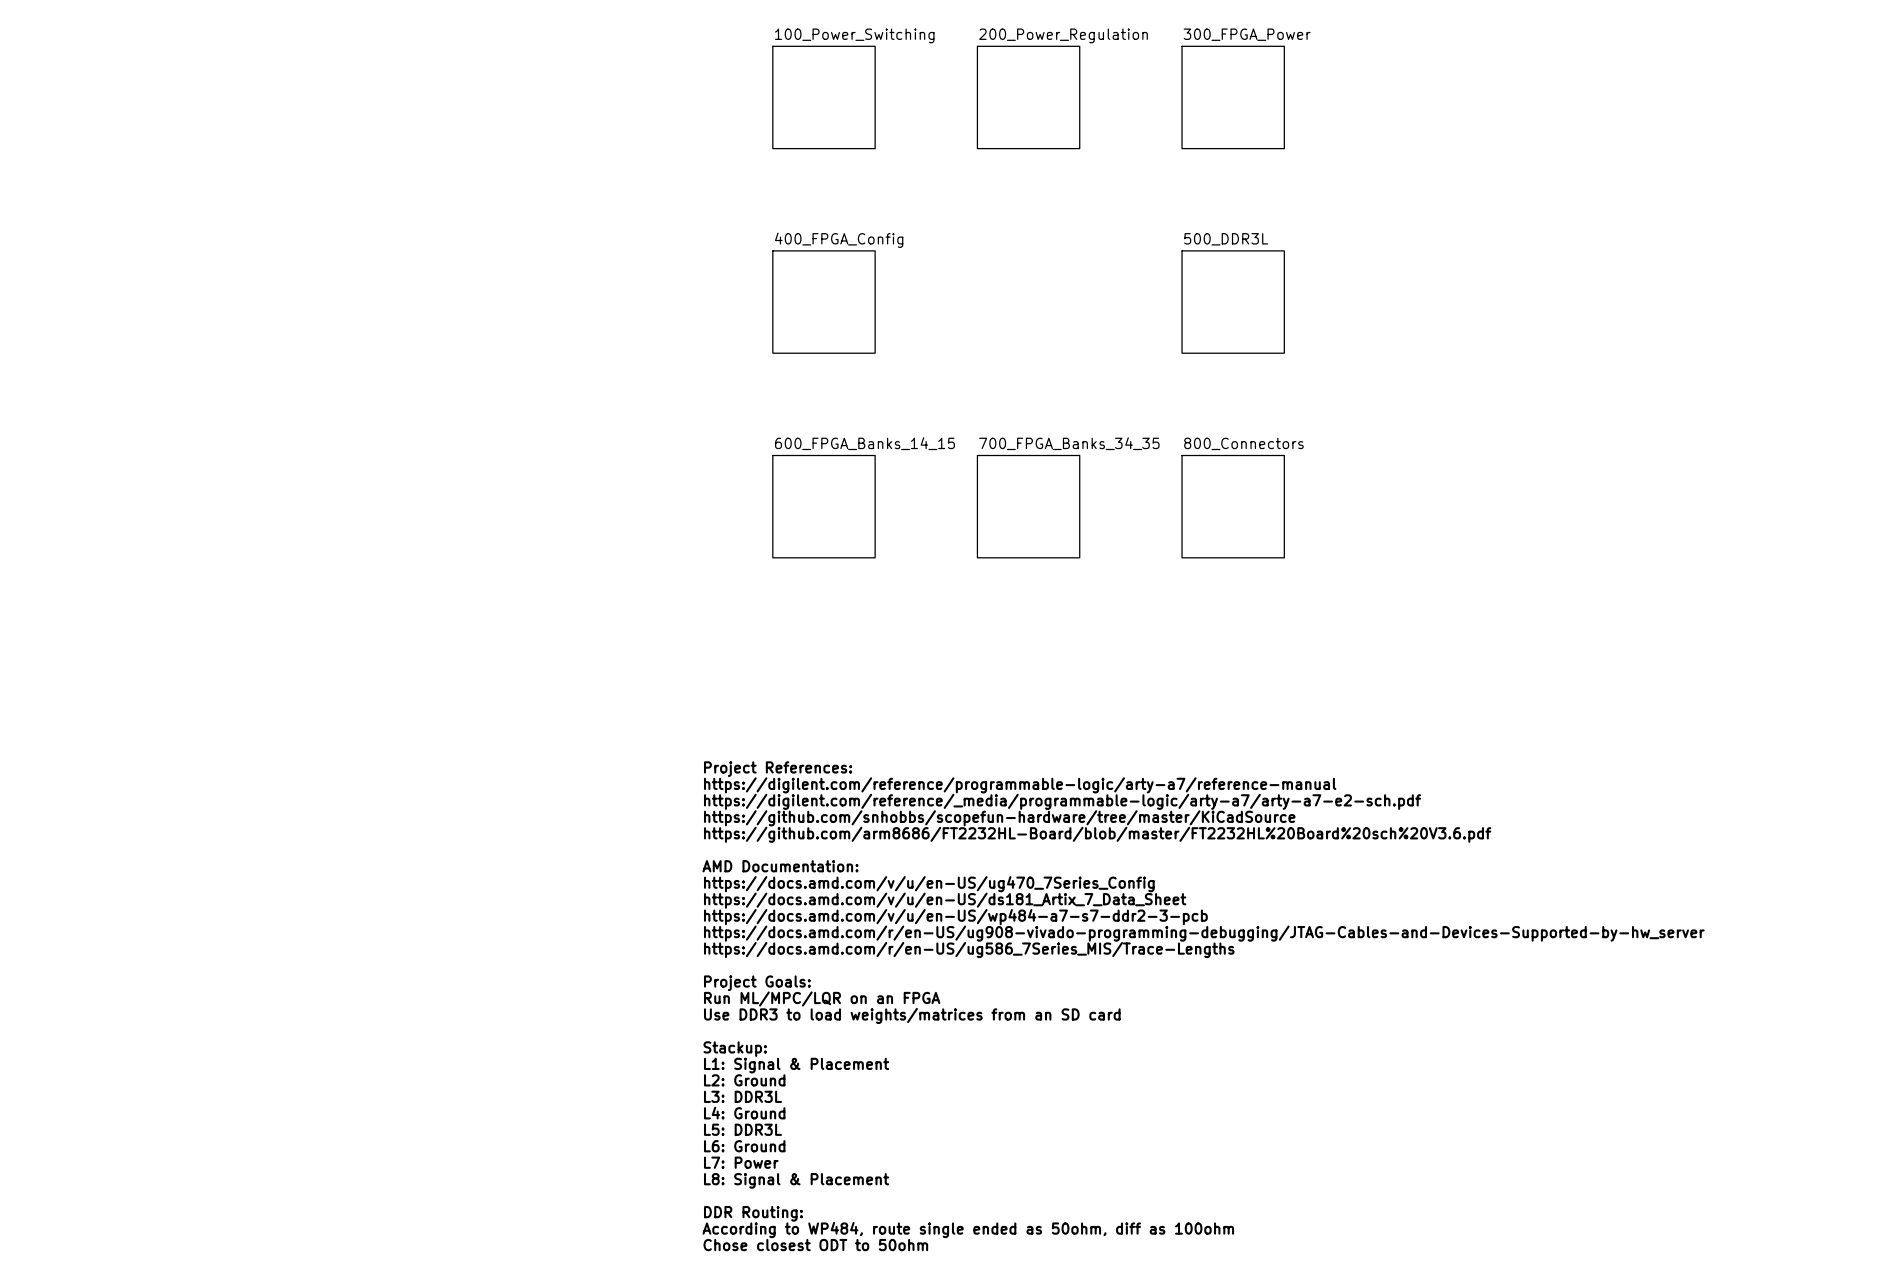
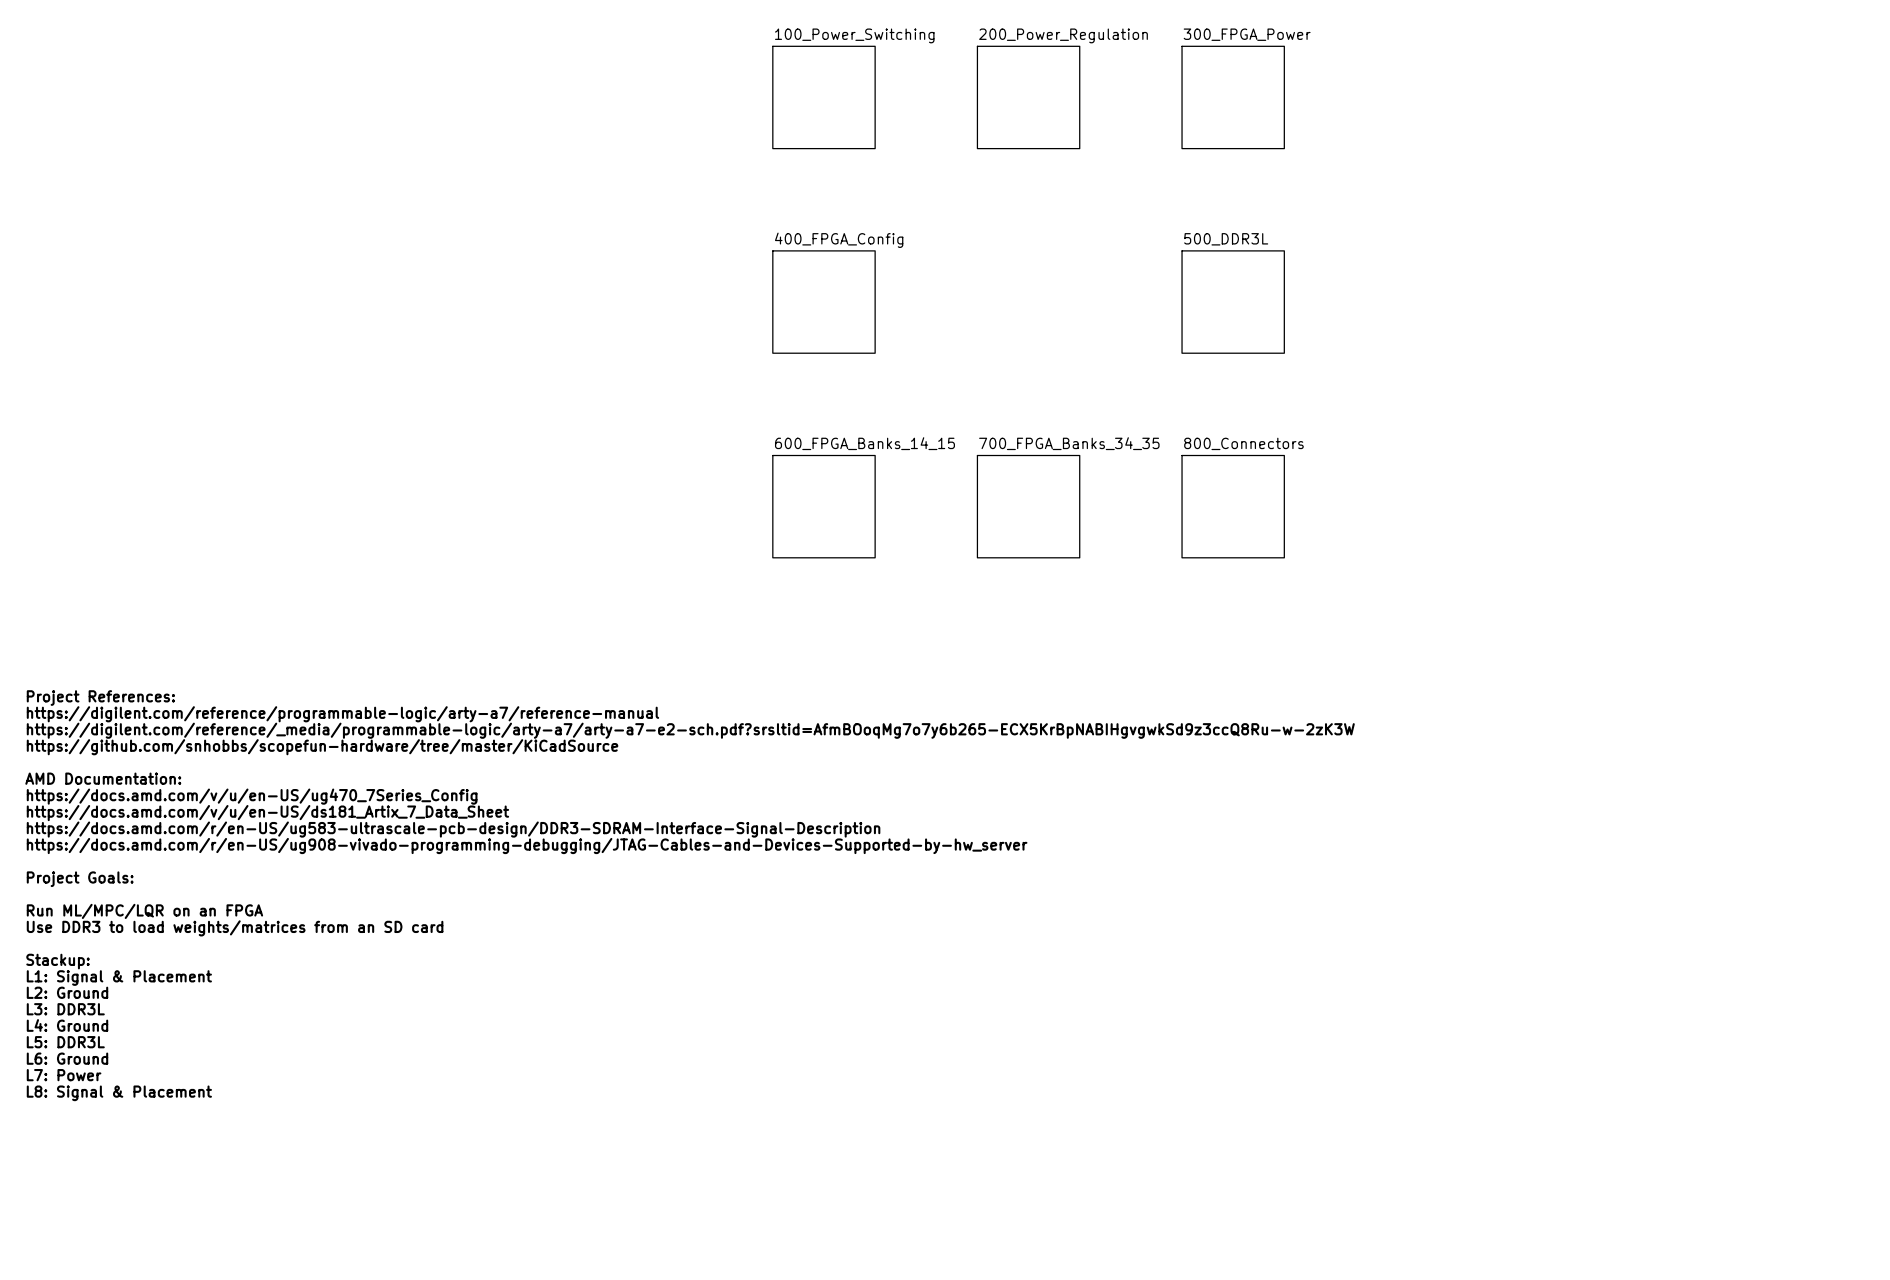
text: none -> Project References: (100, 698)
text: none -> https://digilent.com/reference/programmable-logic/arty-a7/reference-manual (342, 714)
text: none -> https://digilent.com/reference/_media/programmable-logic/arty-a7/arty-a7-e2-sch.pdf?srsltid=AfmBOoqMg7o7y6b265-ECX5KrBpNABIHgvgwkSd9z3ccQ8Ru-w-2zK3W (690, 730)
text: none -> https://github.com/snhobbs/scopefun-hardware/tree/master/KiCadSource (322, 747)
text: Project References: (778, 769) -> none
text: none -> AMD Documentation: (103, 778)
text: https://digilent.com/reference/programmable-logic/arty-a7/reference-manual (1020, 785) -> none
text: none -> https://docs.amd.com/v/u/en-US/ug470_7Series_Config (252, 796)
text: https://digilent.com/reference/_media/programmable-logic/arty-a7/arty-a7-e2-sch.pdf (1062, 801) -> none
text: none -> https://docs.amd.com/v/u/en-US/ds181_Artix_7_Data_Sheet (267, 813)
text: https://github.com/snhobbs/scopefun-hardware/tree/master/KiCadSource (999, 818) -> none
text: none -> https://docs.amd.com/r/en-US/ug583-ultrascale-pcb-design/DDR3-SDRAM-Interface-Signal-Description (453, 829)
text: https://github.com/arm8686/FT2232HL-Board/blob/master/FT2232HL%20Board%20sch%20V3.6.pdf (1097, 834) -> none
text: none -> https://docs.amd.com/r/en-US/ug908-vivado-programming-debugging/JTAG-Cables-and-Devices-Supported-by-hw_server (527, 846)
text: AMD Documentation: (780, 866) -> none
text: none -> Project Goals: (80, 879)
text: https://docs.amd.com/v/u/en-US/ug470_7Series_Config (929, 884) -> none
text: https://docs.amd.com/v/u/en-US/ds181_Artix_7_Data_Sheet (945, 900) -> none
text: none -> Run ML/MPC/LQR on an FPGA (144, 911)
text: https://docs.amd.com/v/u/en-US/wp484-a7-s7-ddr2-3-pcb (955, 917) -> none
text: none -> Use DDR3 to load weights/matrices from an SD card (235, 928)
text: https://docs.amd.com/r/en-US/ug908-vivado-programming-debugging/JTAG-Cables-and-Devices-Supported-by-hw_server (1204, 933) -> none
text: https://docs.amd.com/r/en-US/ug586_7Series_MIS/Trace-Lengths (969, 950) -> none
text: none -> Stackup: (57, 961)
text: none -> L1: Signal & Placement (119, 978)
text: Project Goals: (757, 983) -> none
text: none -> L2: Ground (67, 992)
text: Run ML/MPC/LQR on an FPGA (822, 998) -> none
text: none -> L3: DDR3L (65, 1009)
text: Use DDR3 to load weights/matrices from an SD card (912, 1015) -> none
text: none -> L4: Ground (67, 1025)
text: none -> L5: DDR3L (65, 1042)
text: Stackup: (735, 1049) -> none
text: none -> L6: Ground (67, 1058)
text: L1: Signal & Placement (796, 1065) -> none
text: none -> L7: Power (64, 1075)
text: L2: Ground (744, 1080) -> none
text: none -> L8: Signal & Placement (119, 1093)
text: L3: DDR3L (743, 1096) -> none
text: L4: Ground (744, 1113) -> none
text: L5: DDR3L (743, 1129) -> none
text: L6: Ground (744, 1146) -> none
text: L7: Power (741, 1162) -> none
text: L8: Signal & Placement (796, 1180) -> none
text: DDR Routing: (753, 1213) -> none
text: According to WP484, route single ended as 50ohm, diff as 100ohm (968, 1230) -> none
text: Chose closest ODT to 50ohm (815, 1245) -> none

